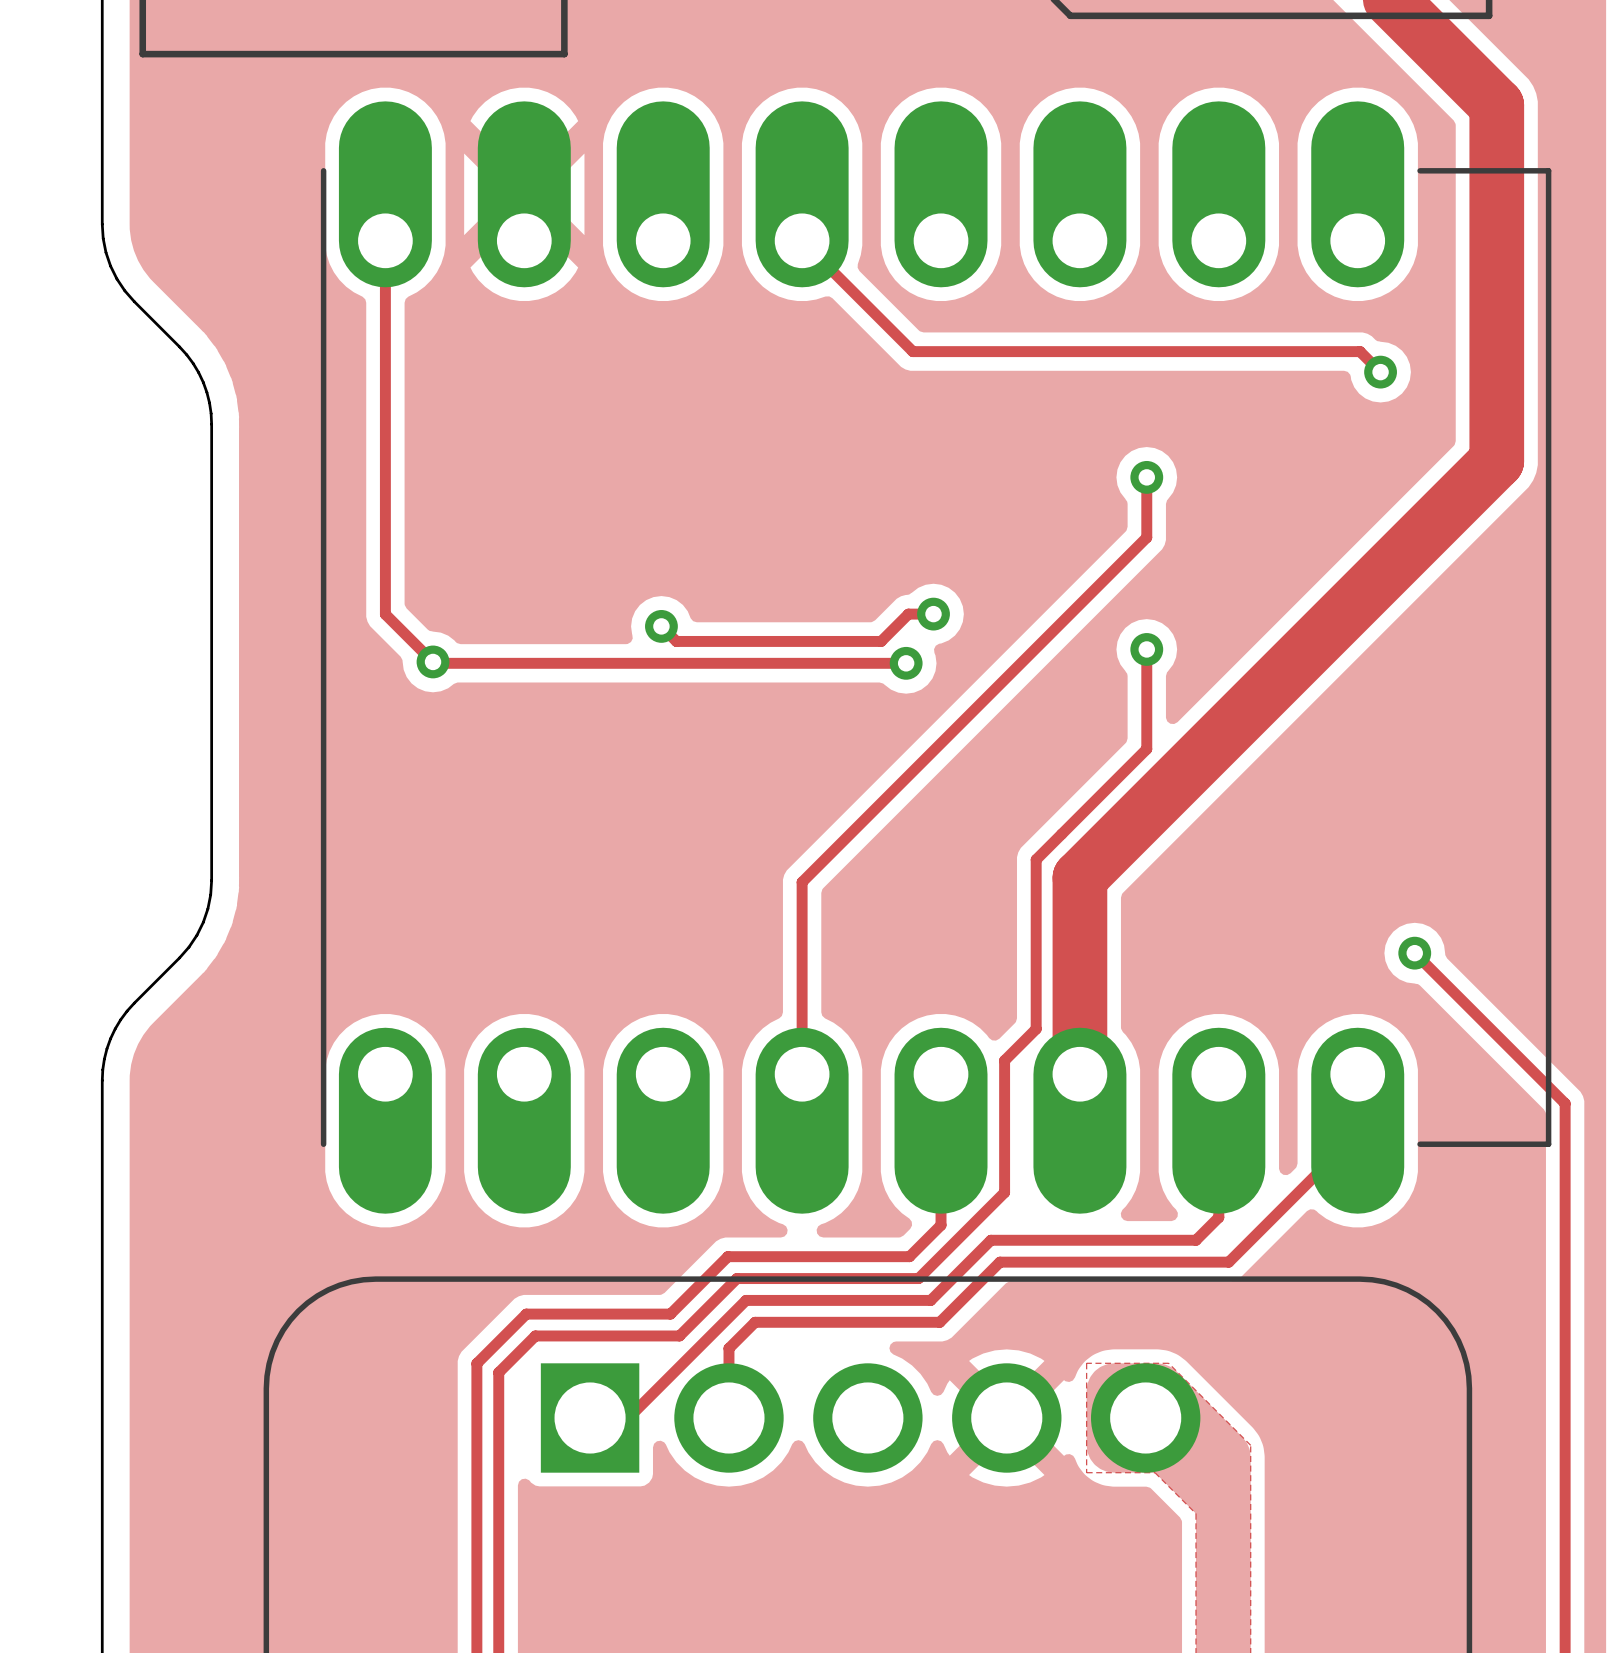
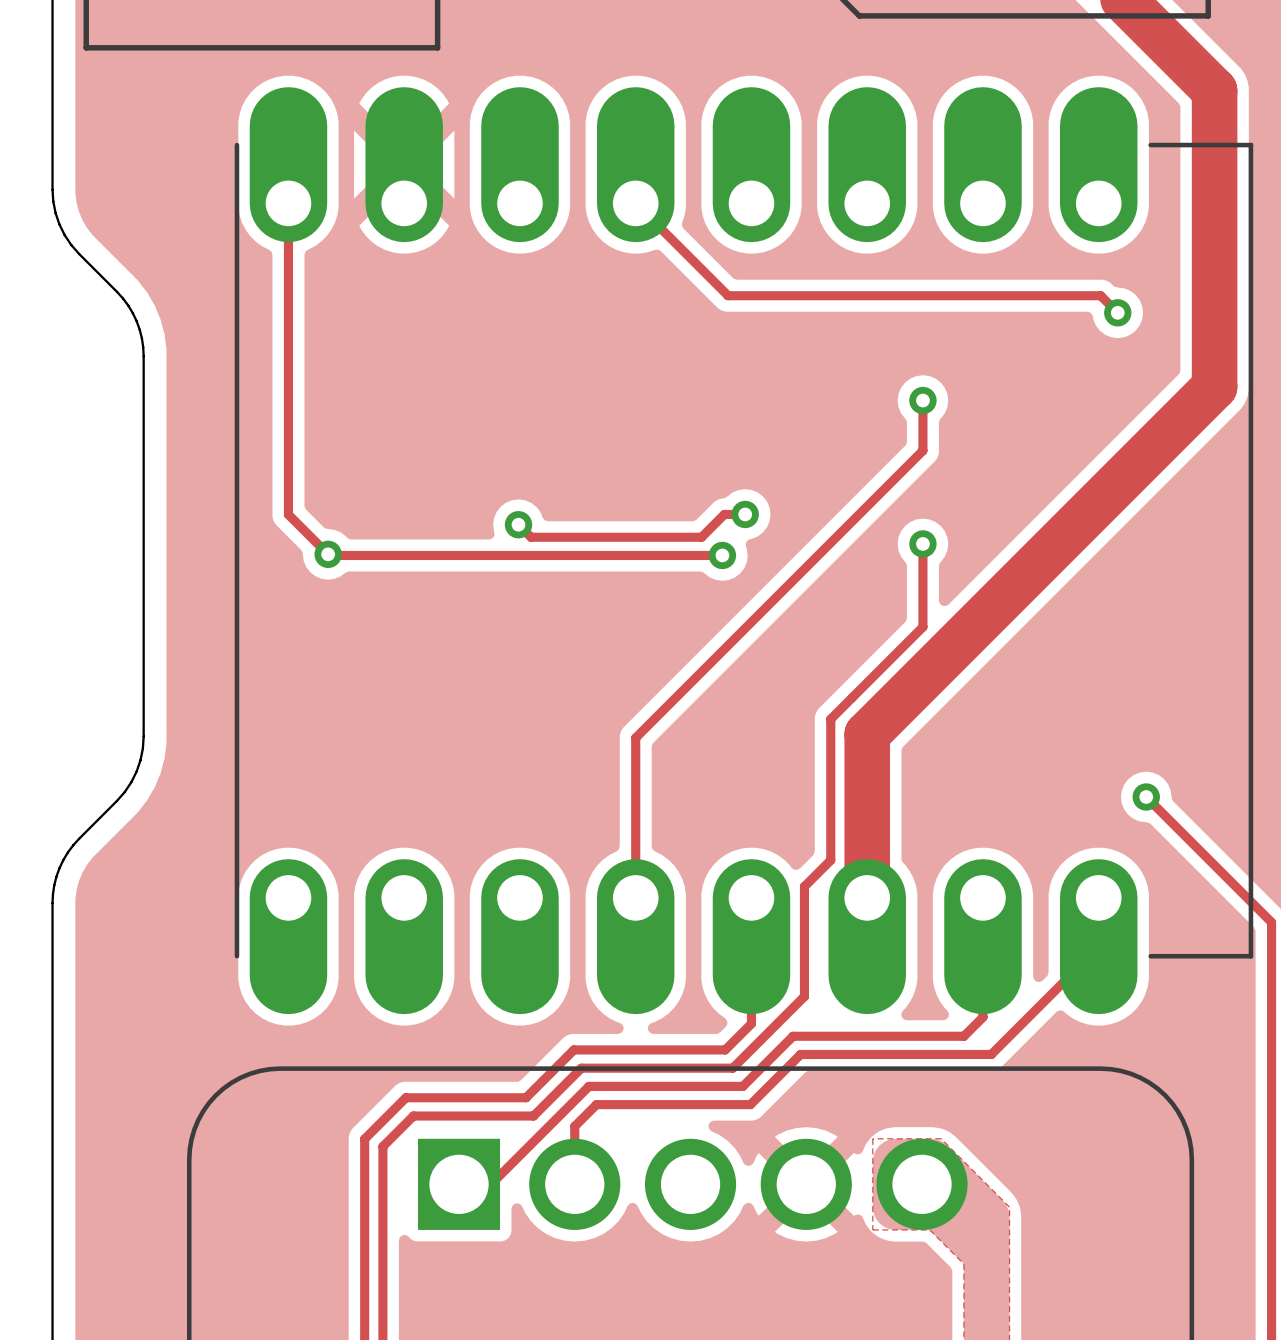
part footprint: [320, 101, 1552, 1214] -> [234, 87, 1254, 1015]

